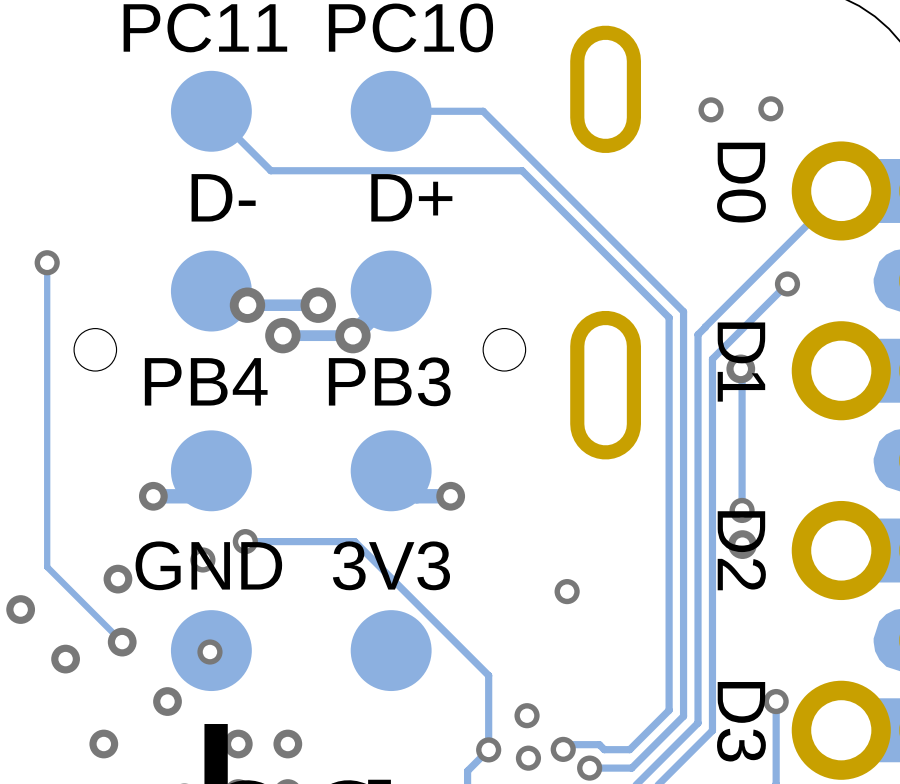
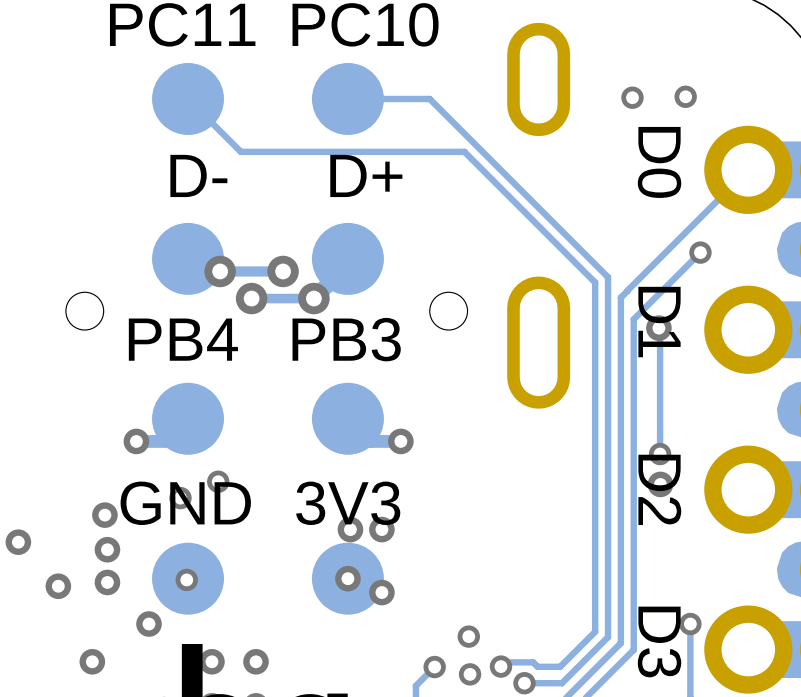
track: (47, 262) (47, 567) (122, 642) -> none
via: (47, 262) -> none
track: (245, 541) (354, 541) (488, 675) (488, 749) -> none
via: (567, 591) -> none
via: none -> (350, 529)
via: none -> (381, 529)
via: none -> (107, 549)
via: (122, 642) -> none
via: none -> (347, 578)
via: none -> (107, 582)
via: none -> (381, 592)

